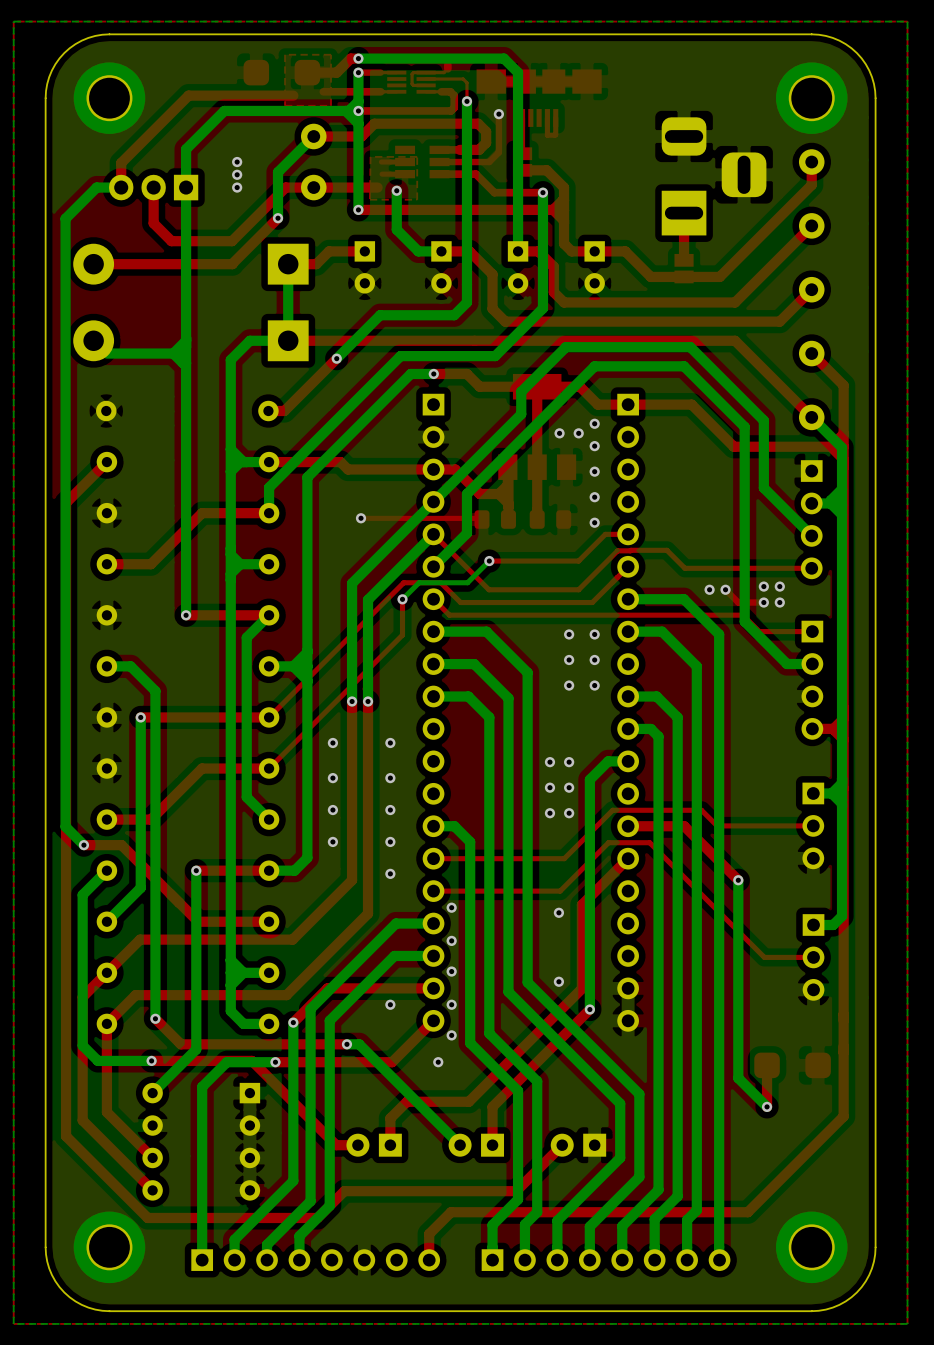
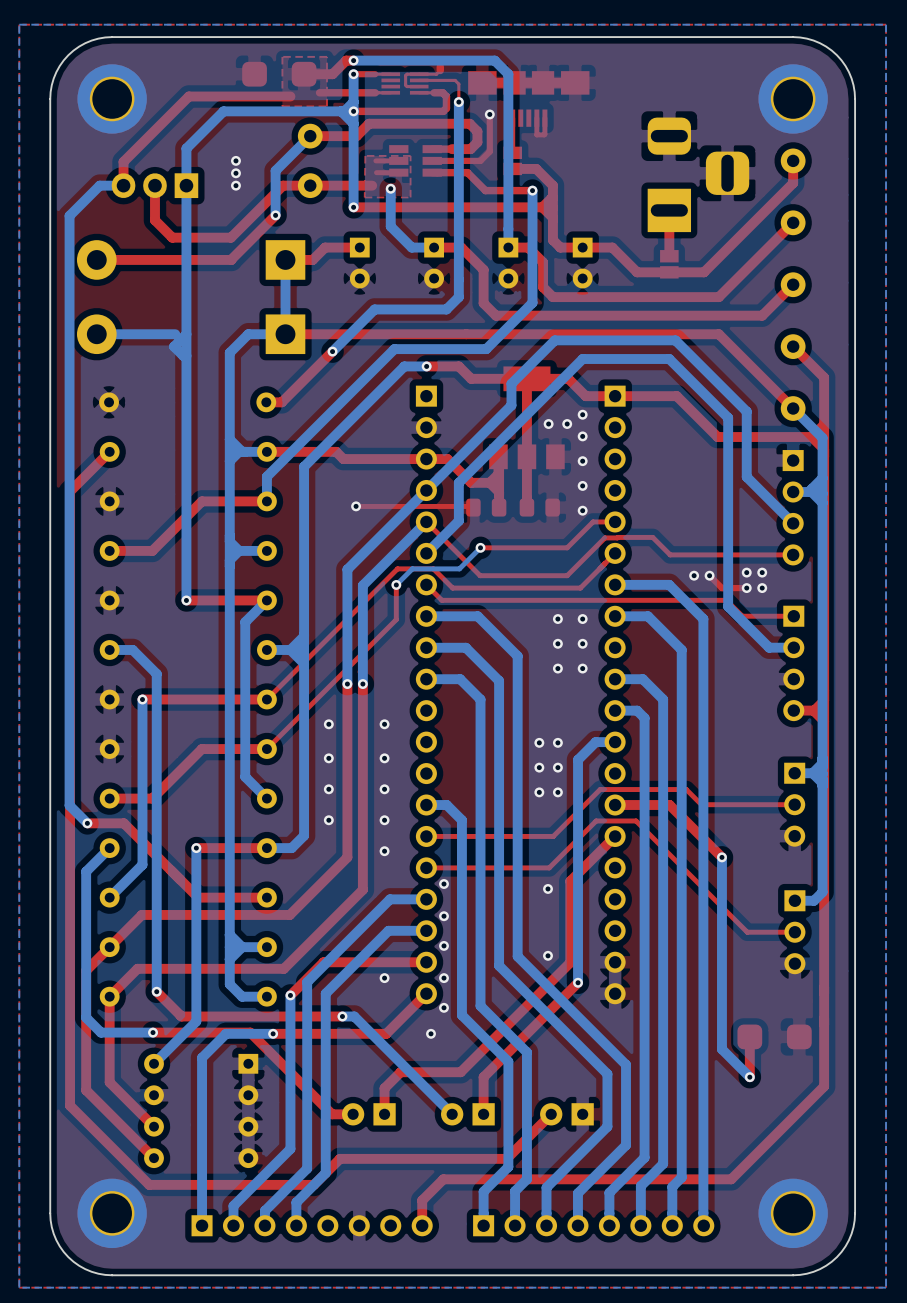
bottom track: none -> (175, 334) (96, 334)
bottom track: (173, 353) (106, 353) -> none

